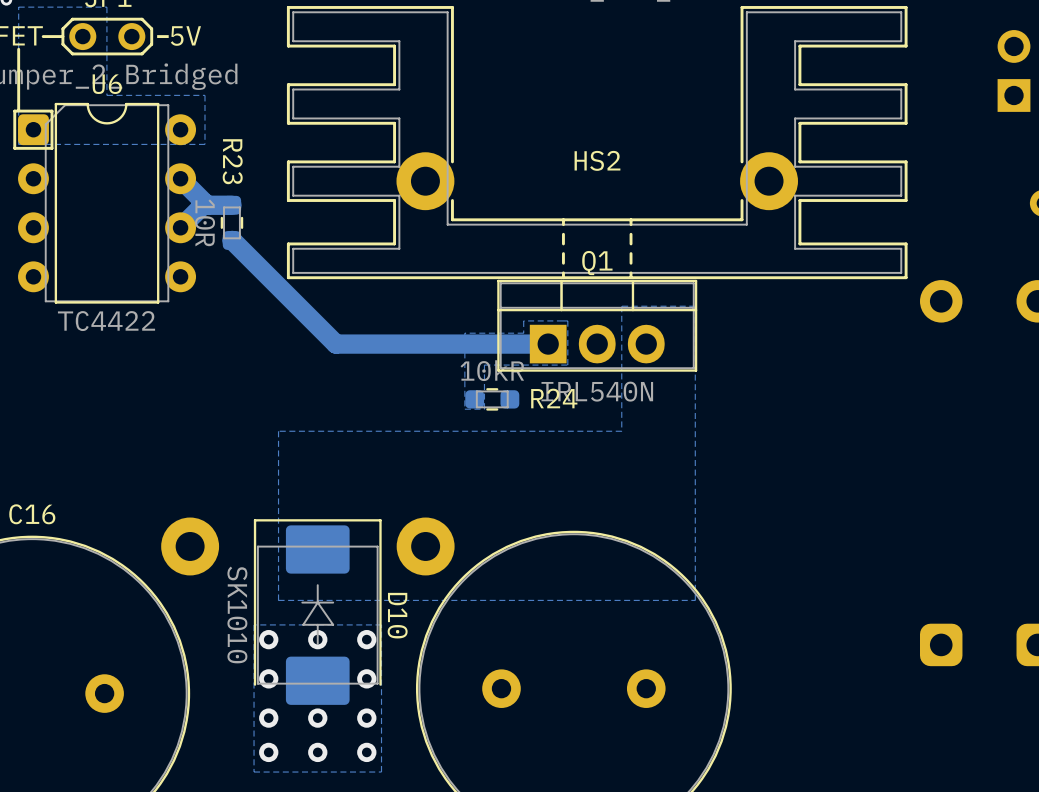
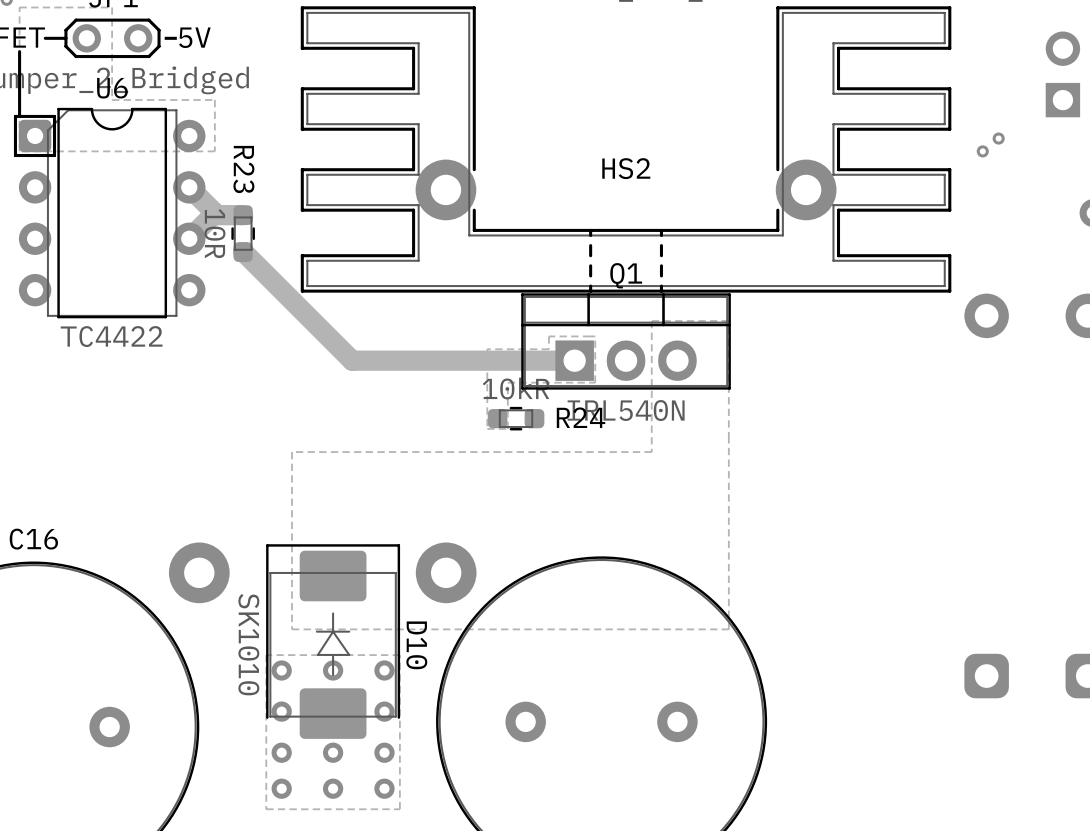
via: none -> (998, 138)
via: none -> (982, 151)

